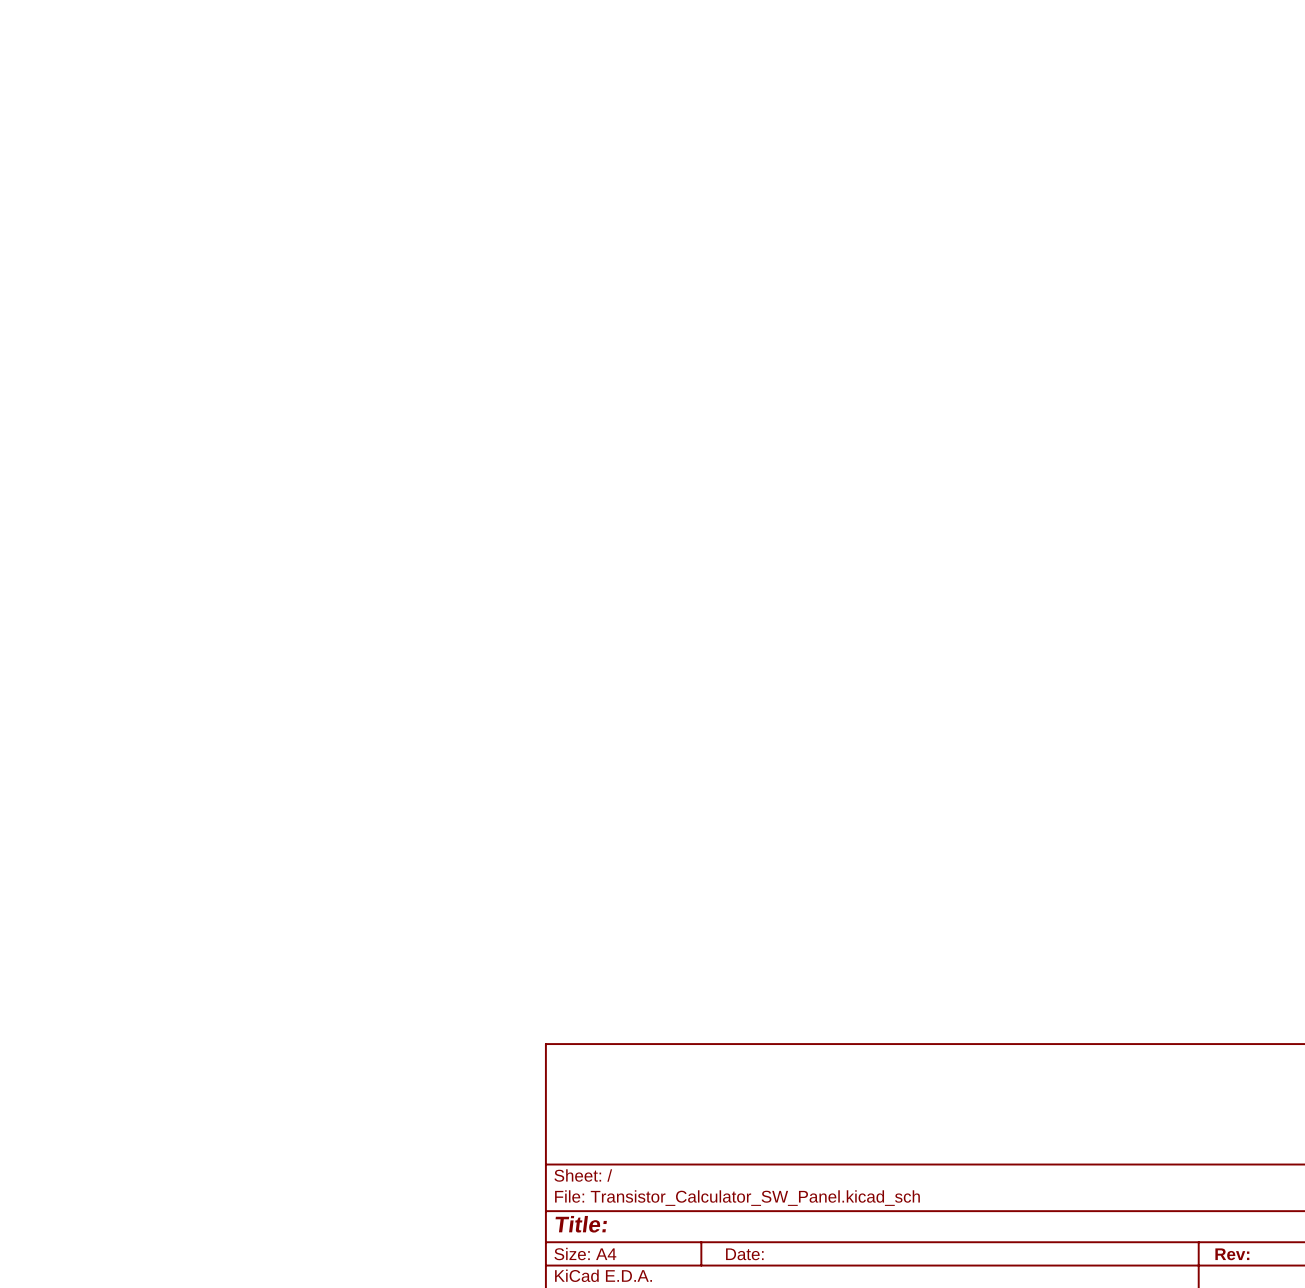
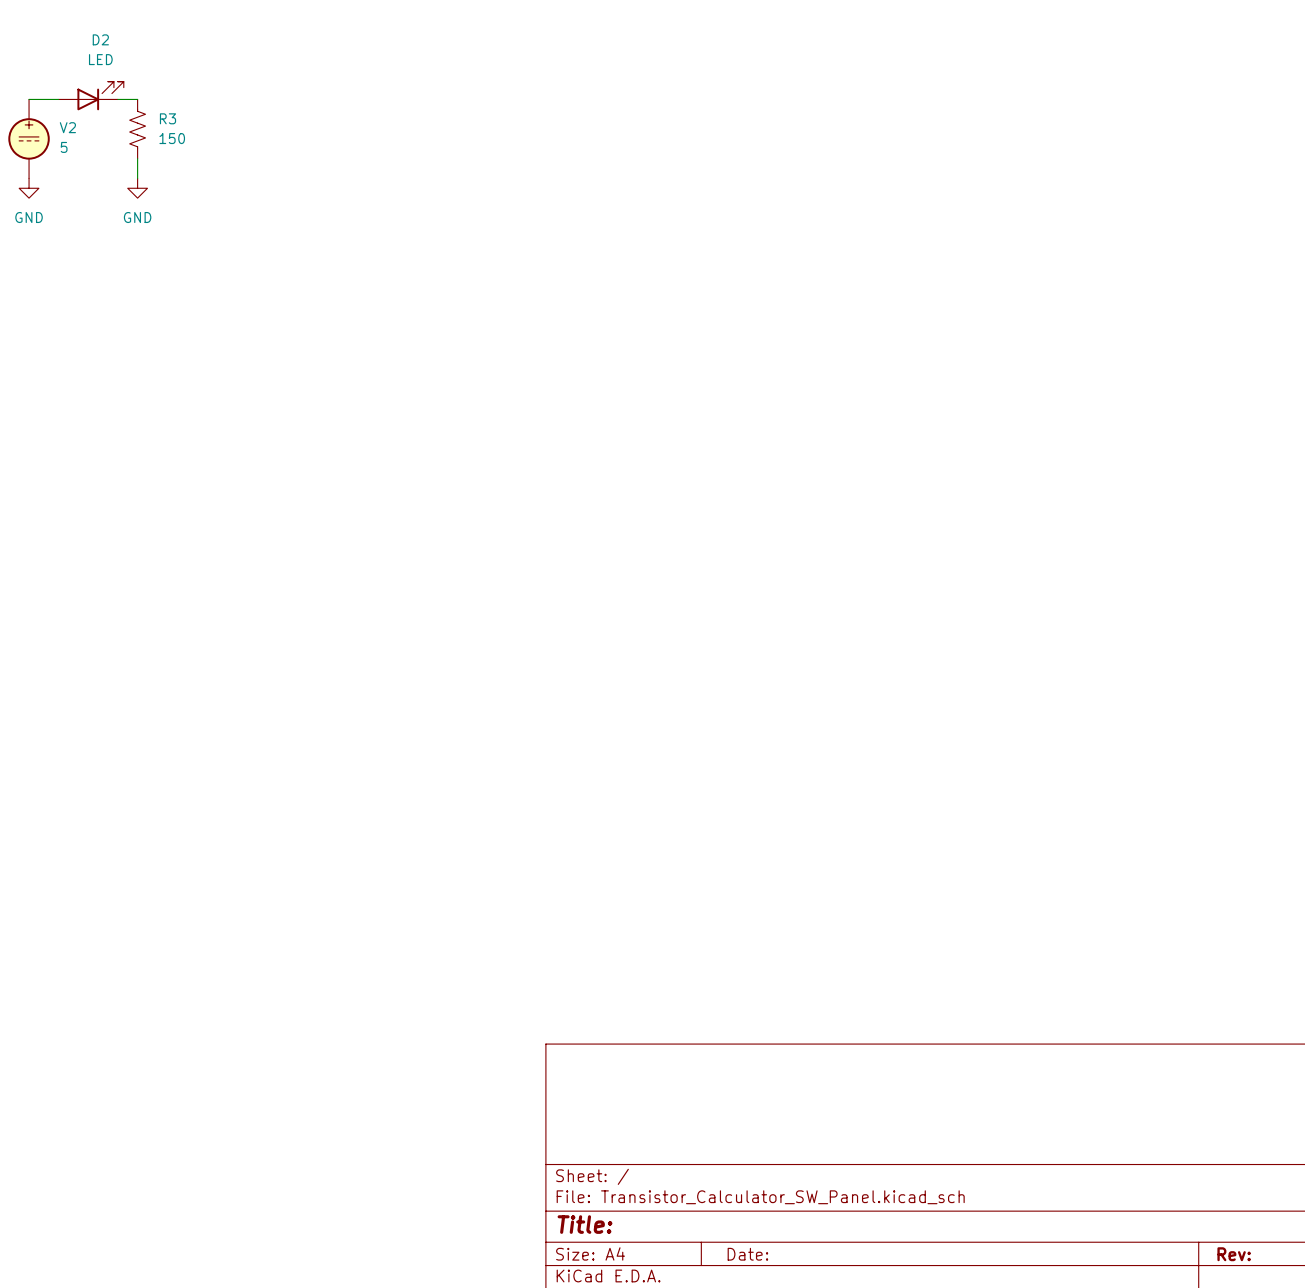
D2: none -> LED (91, 95)
wire: none -> (29, 99) (58, 99)
wire: none -> (117, 99) (137, 99)
R3: none -> 150 (137, 129)
V2: none -> 5 (29, 138)
wire: none -> (137, 158) (137, 178)
power symbol: none -> GND (29, 188)
power symbol: none -> GND (137, 188)

